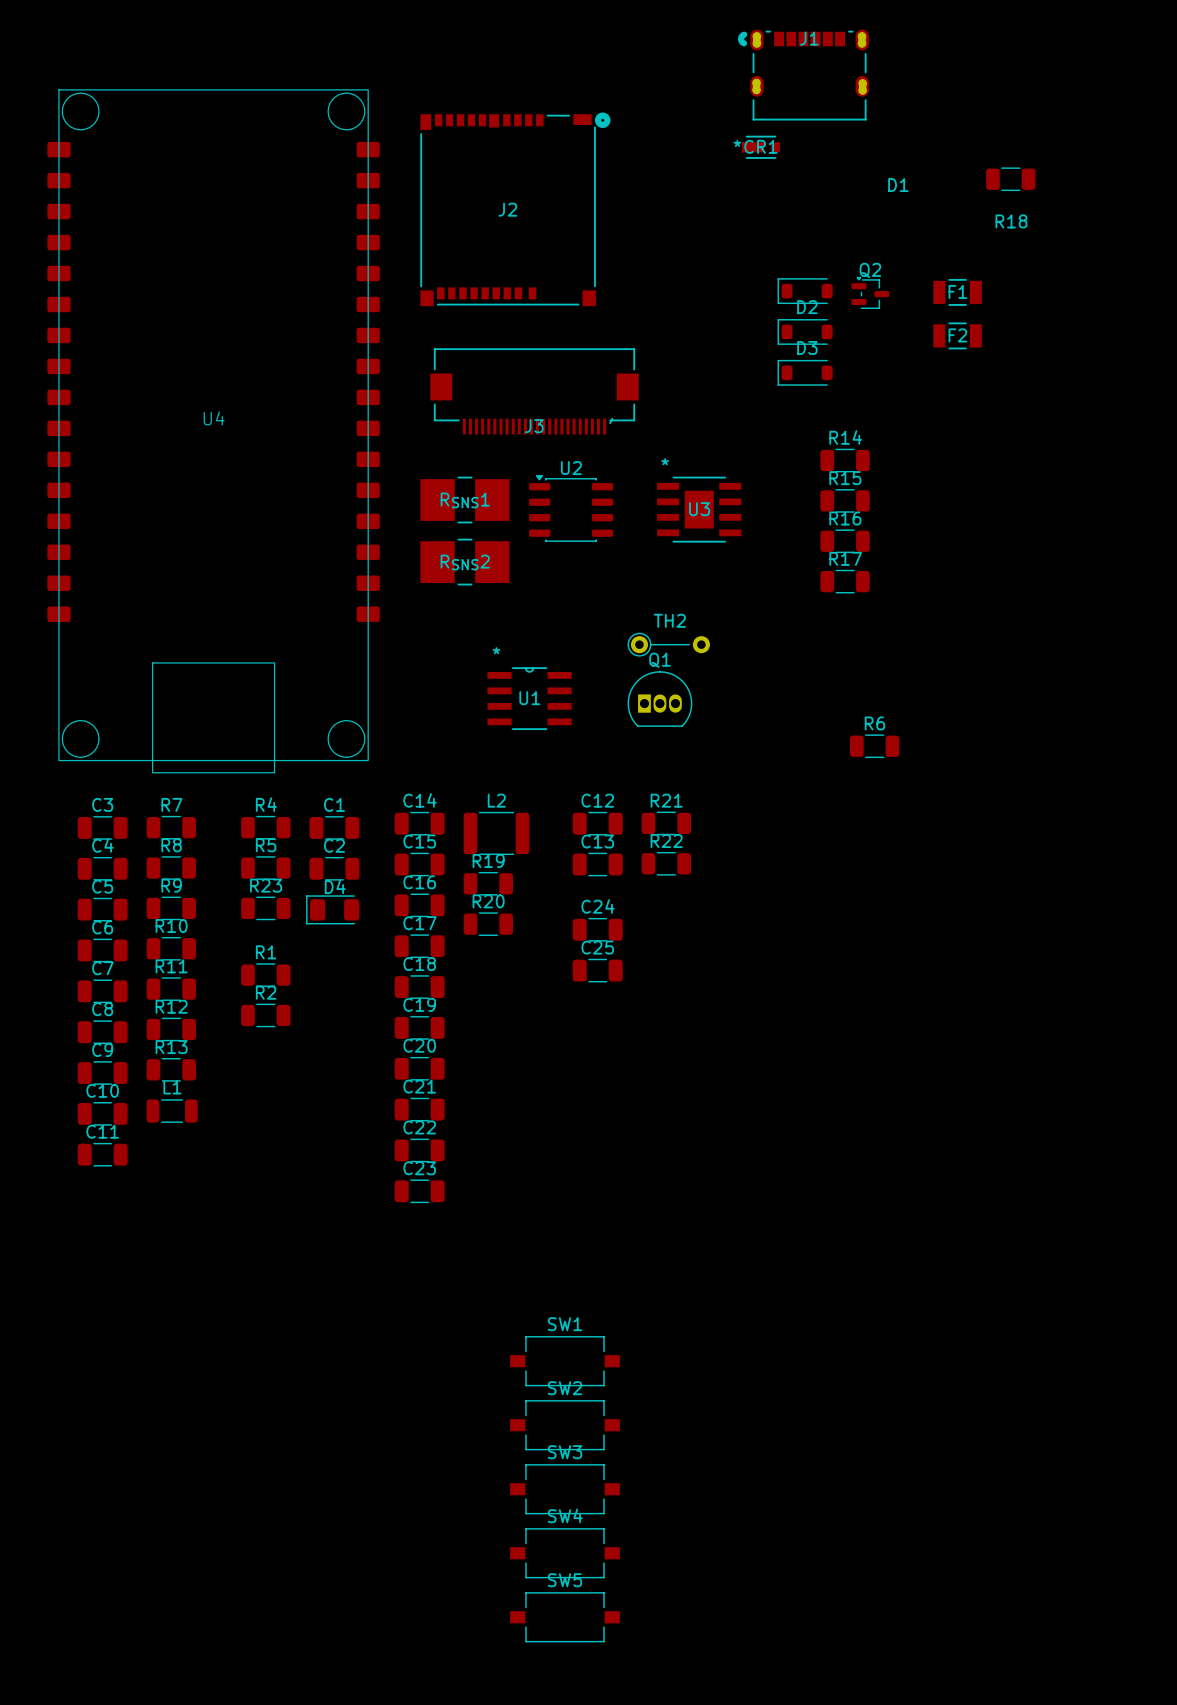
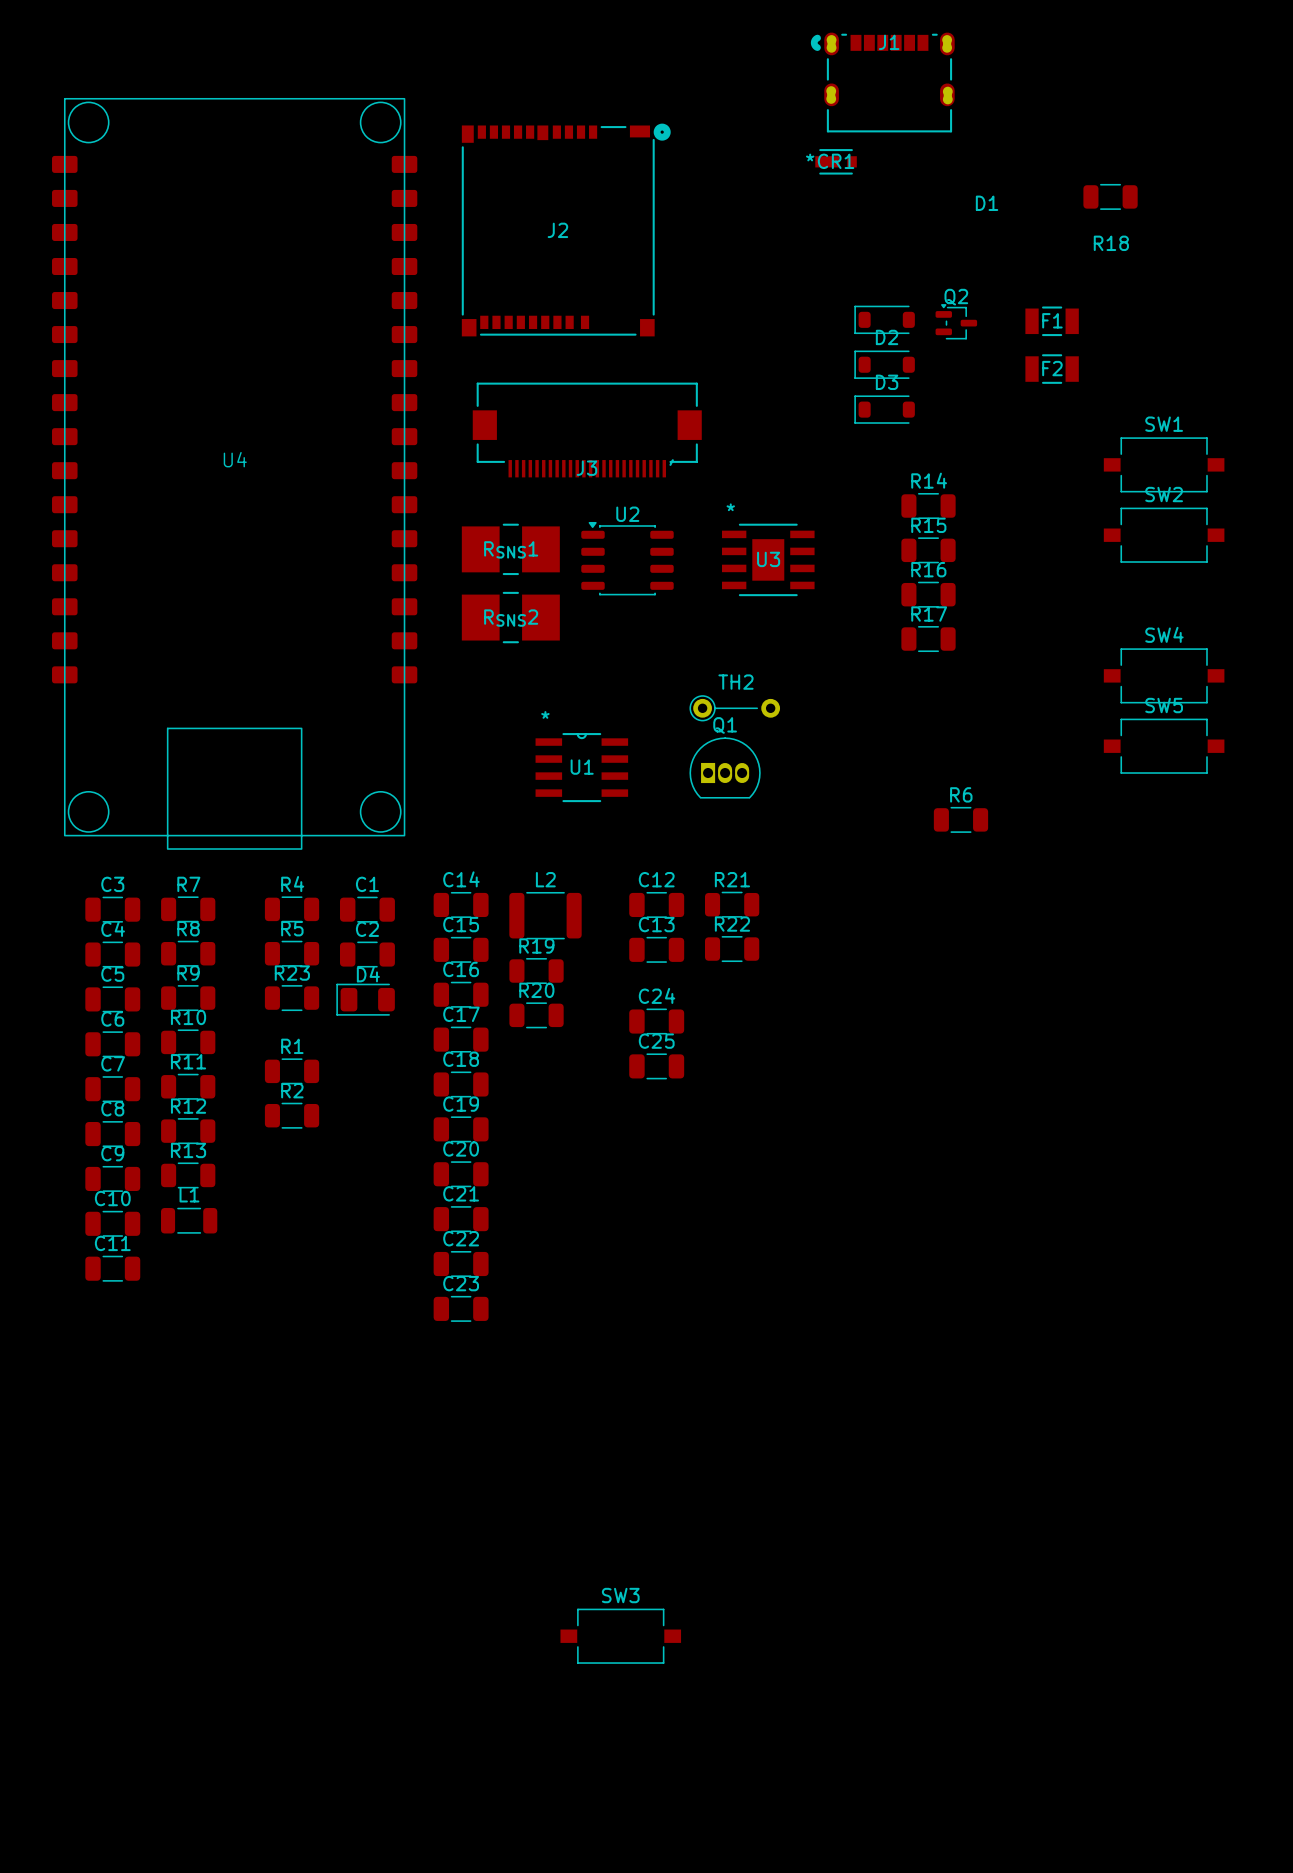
SW1 position: (564, 1361) -> (1164, 464)
SW2 position: (564, 1425) -> (1164, 535)
SW4 position: (564, 1553) -> (1164, 675)
SW5 position: (564, 1617) -> (1164, 746)

